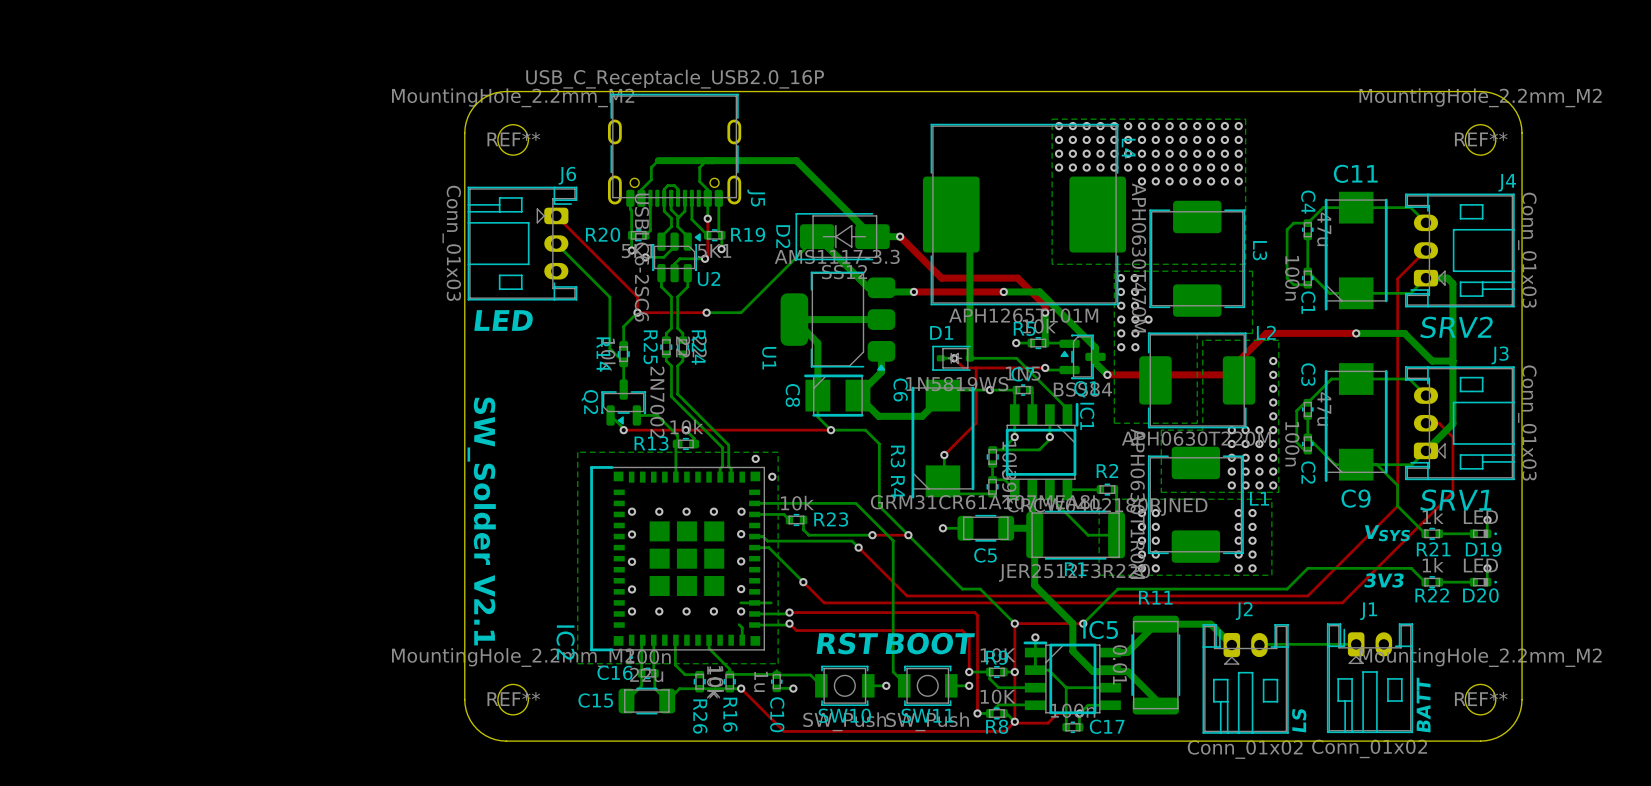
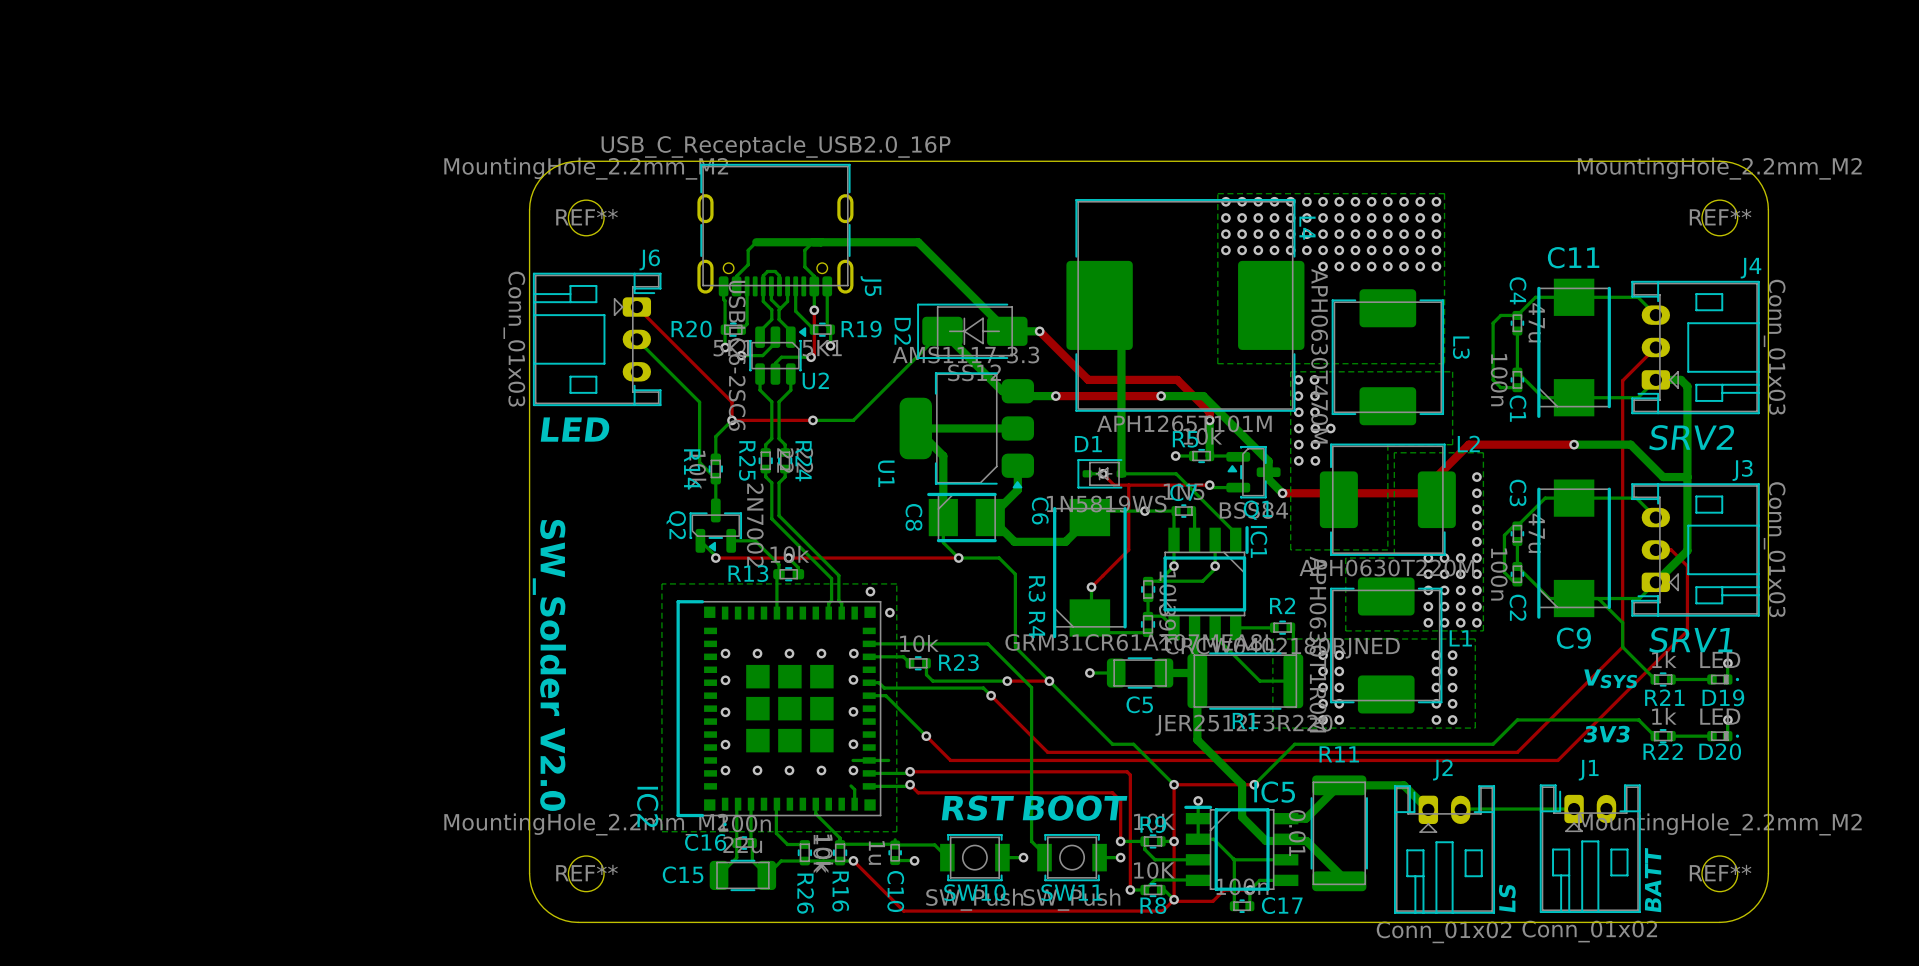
text: SW_Solder V2.1 (481, 521) -> SW_Solder V2.0 (549, 665)

